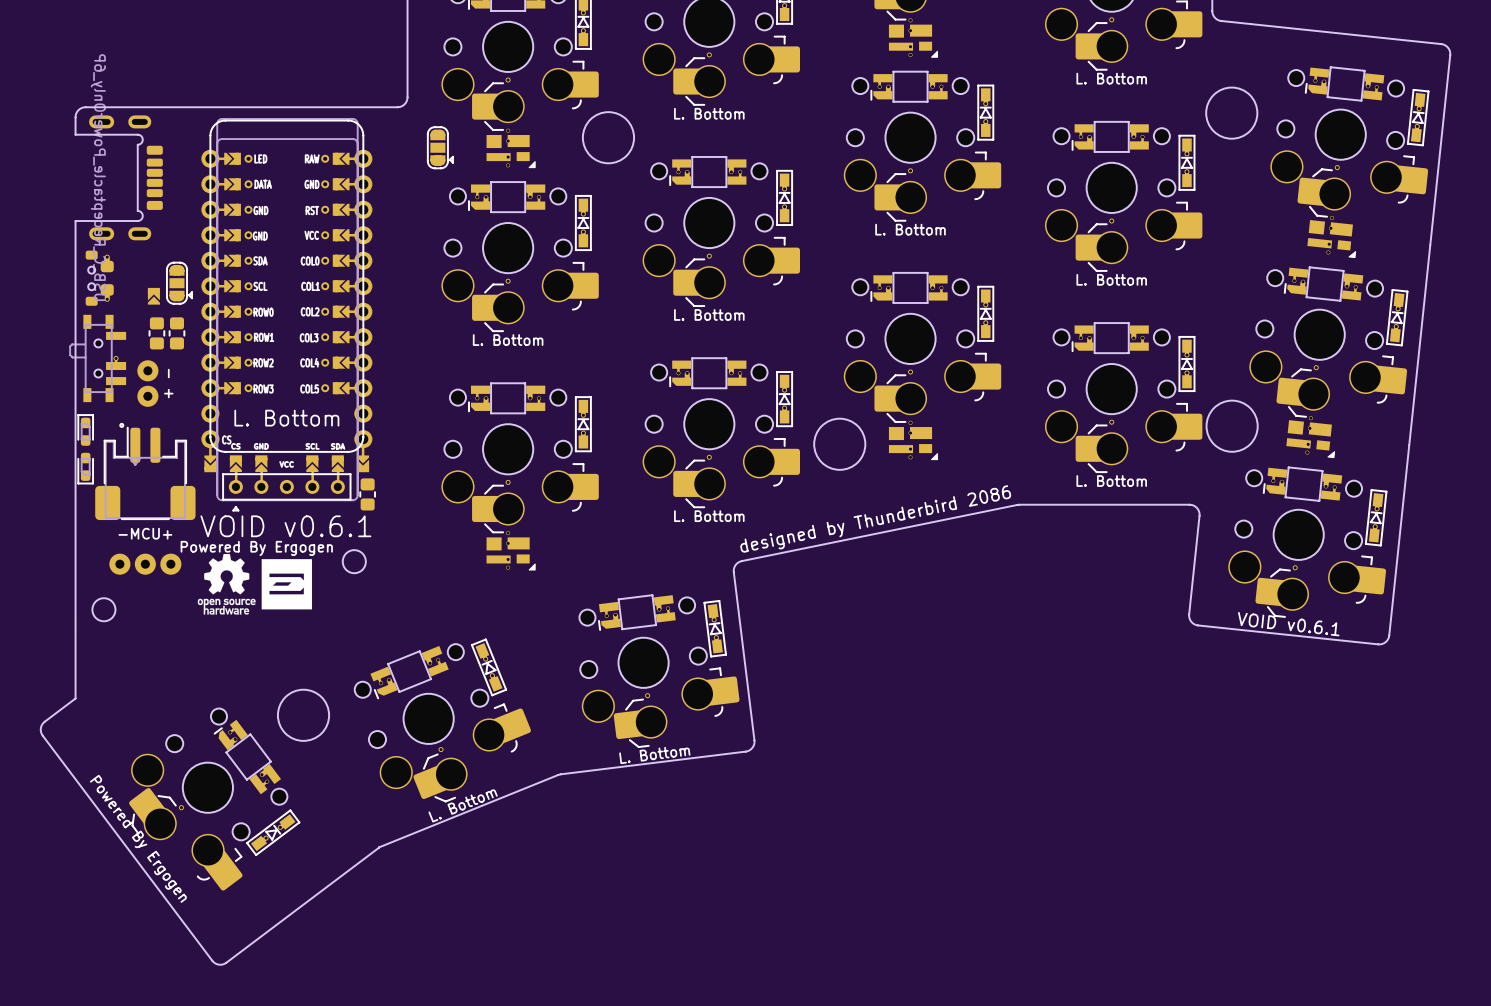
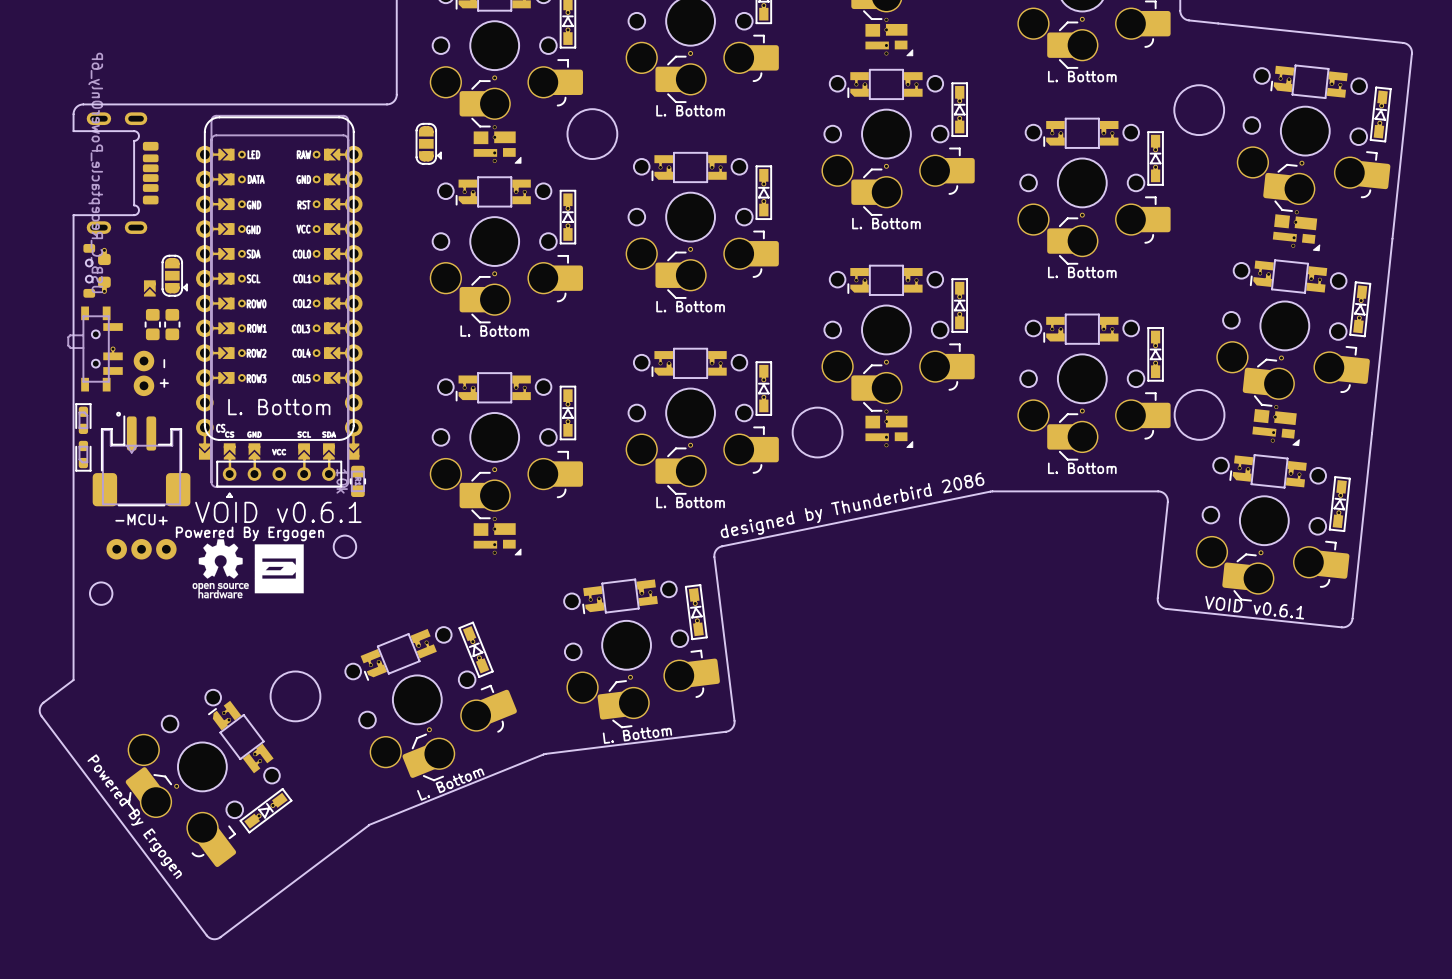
part side: top (367, 494) -> bottom (357, 481)

